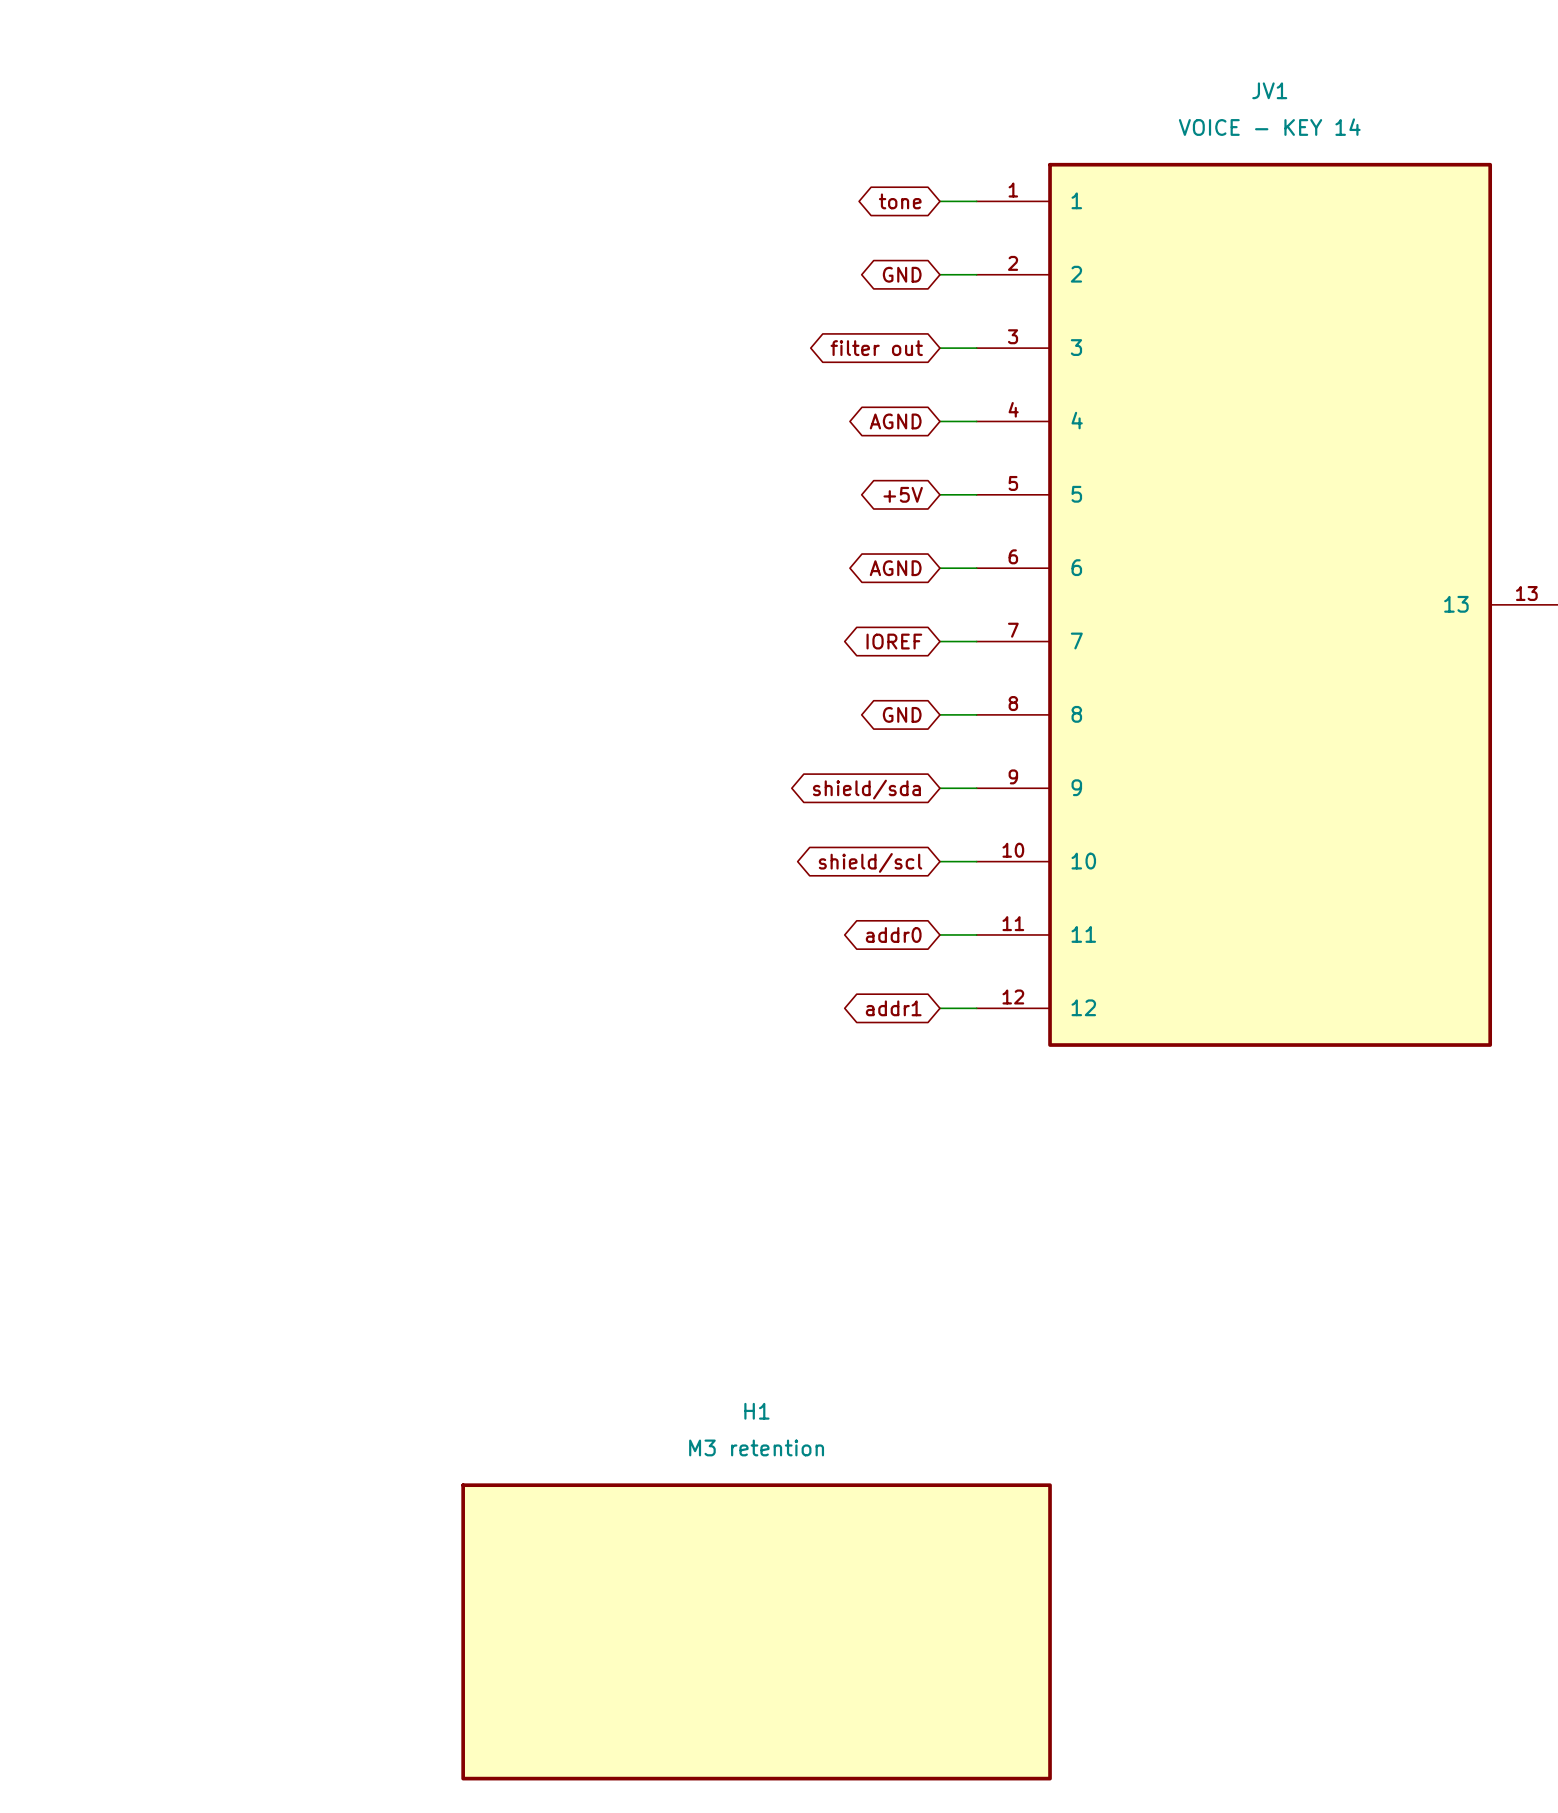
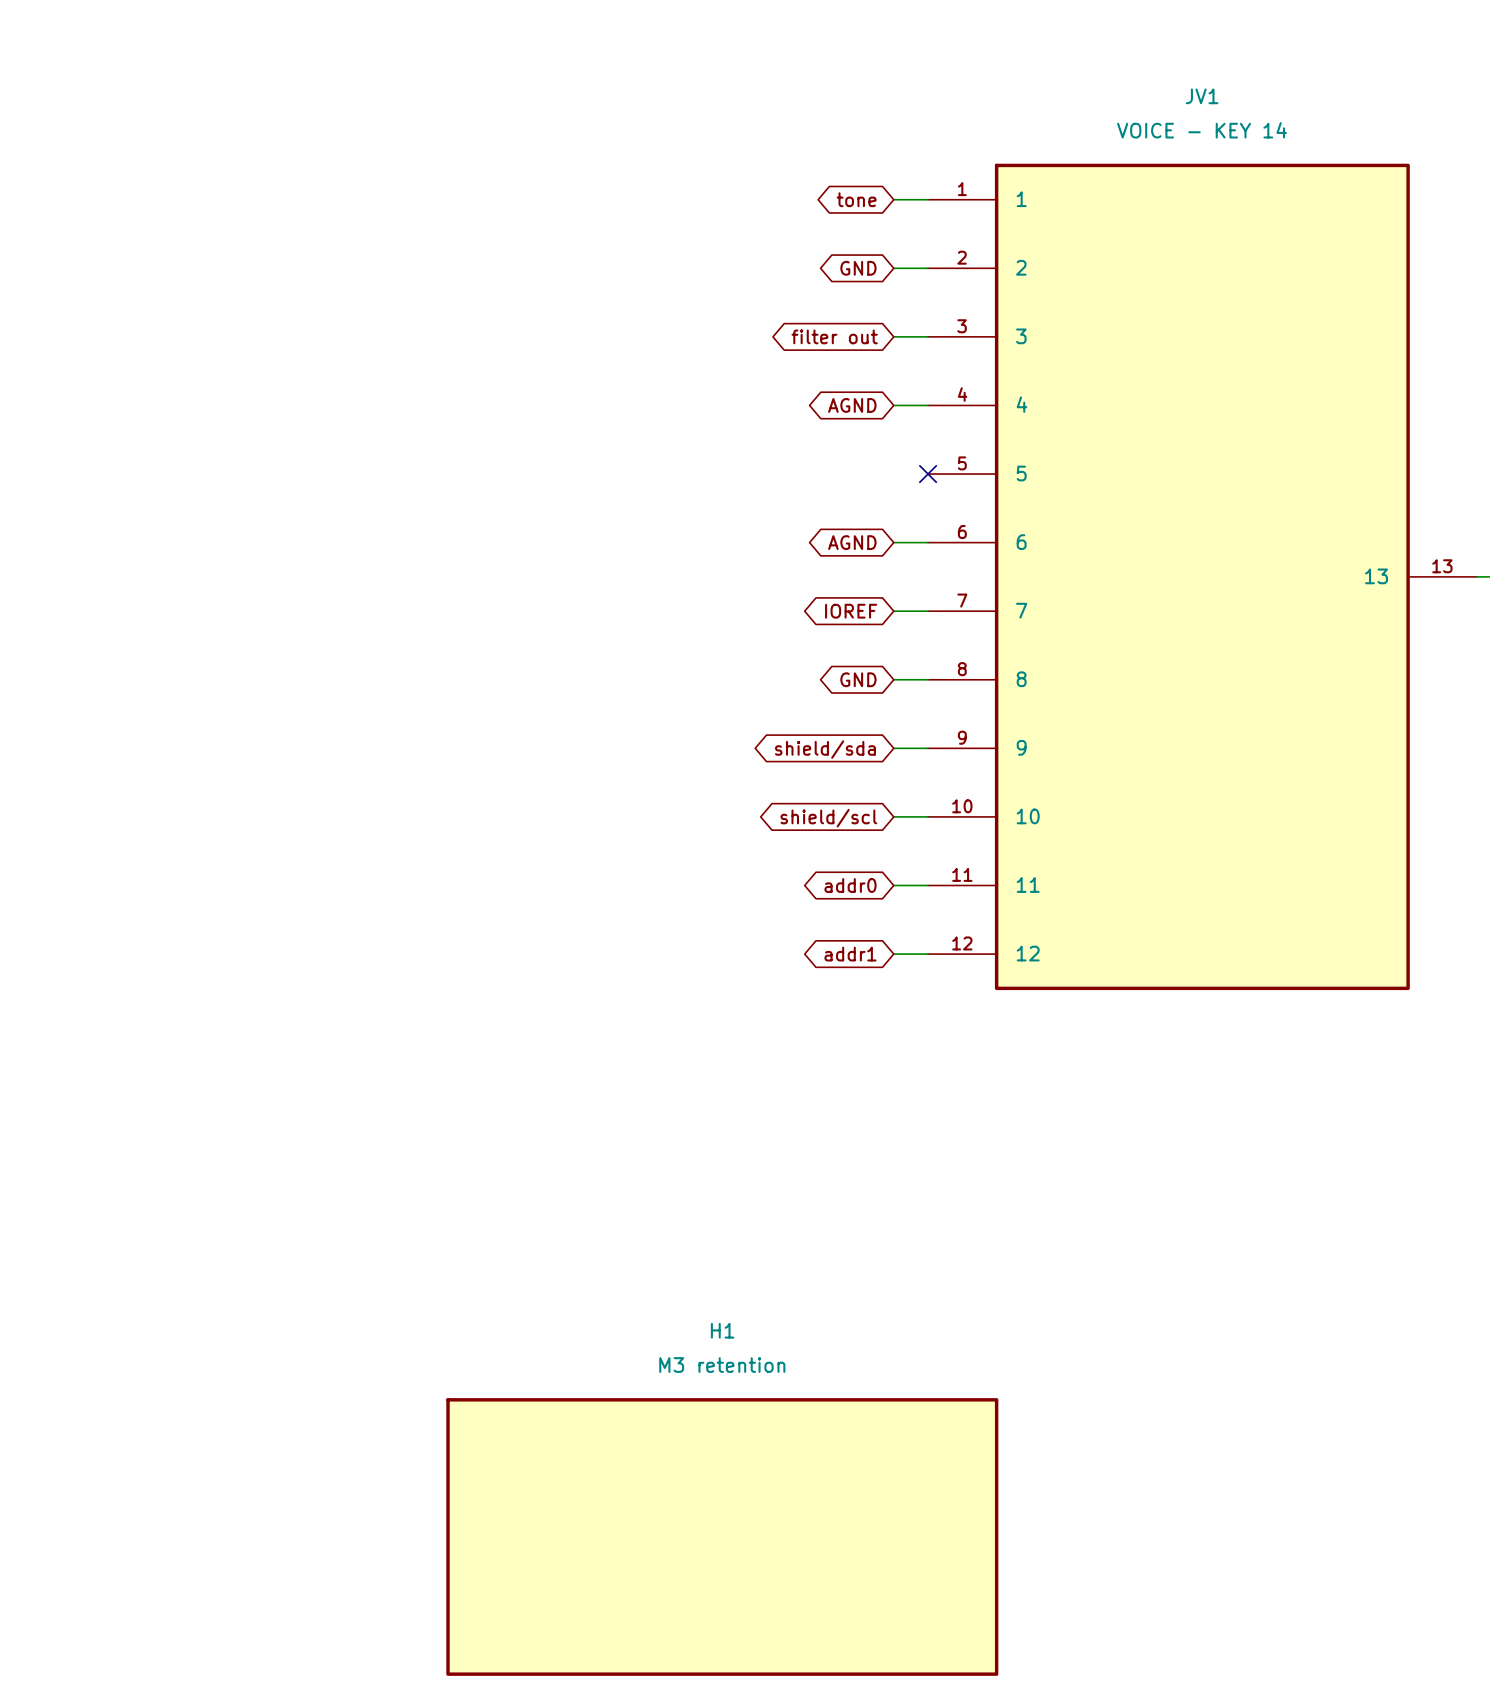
global label: +5V (903, 494) -> none
wire: (939, 494) (976, 494) -> none
no-connect mark: none -> (928, 474)

